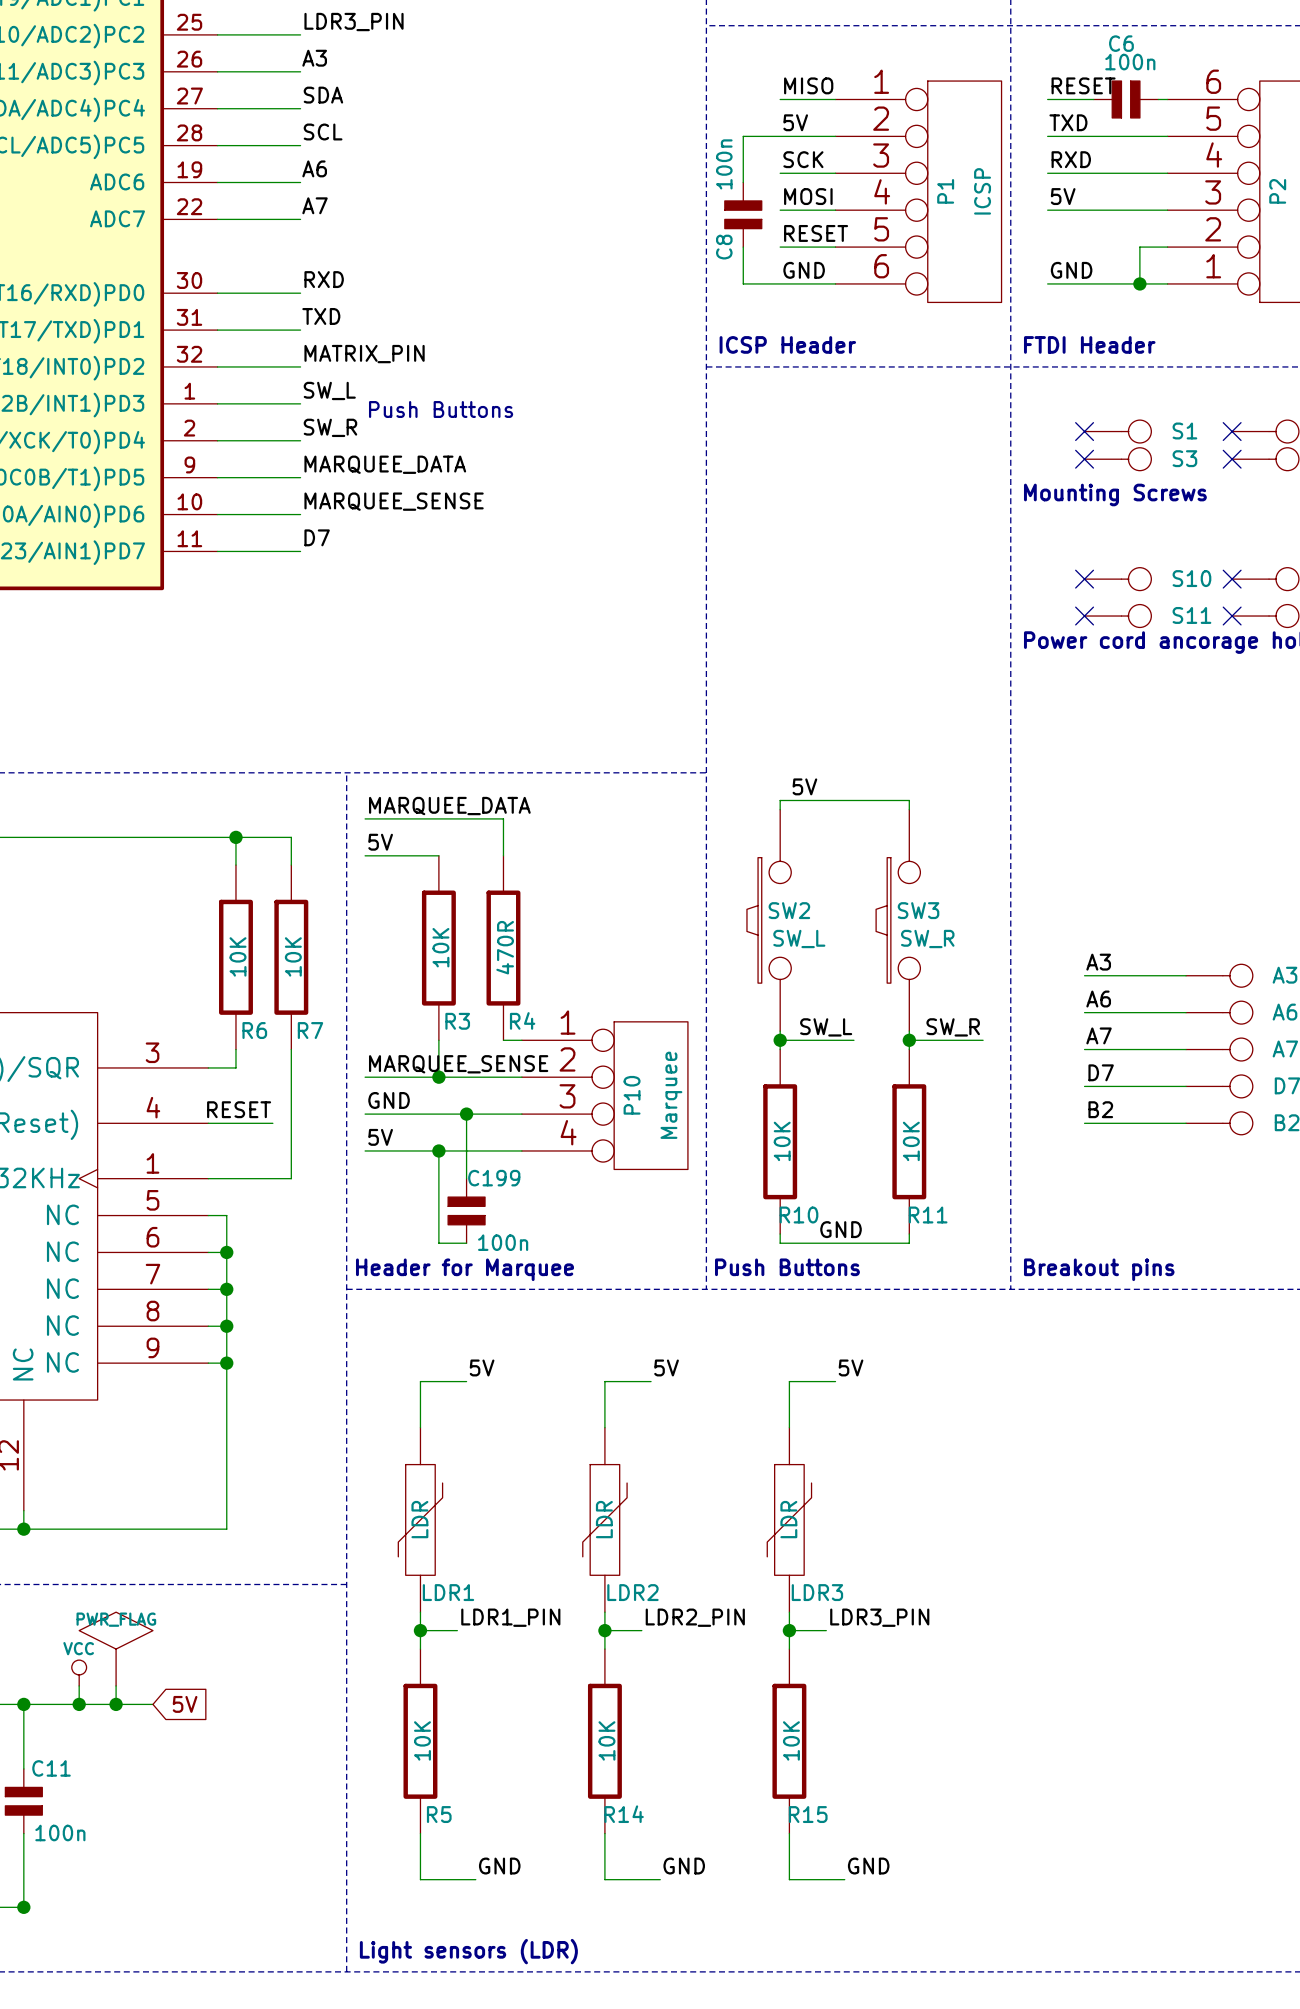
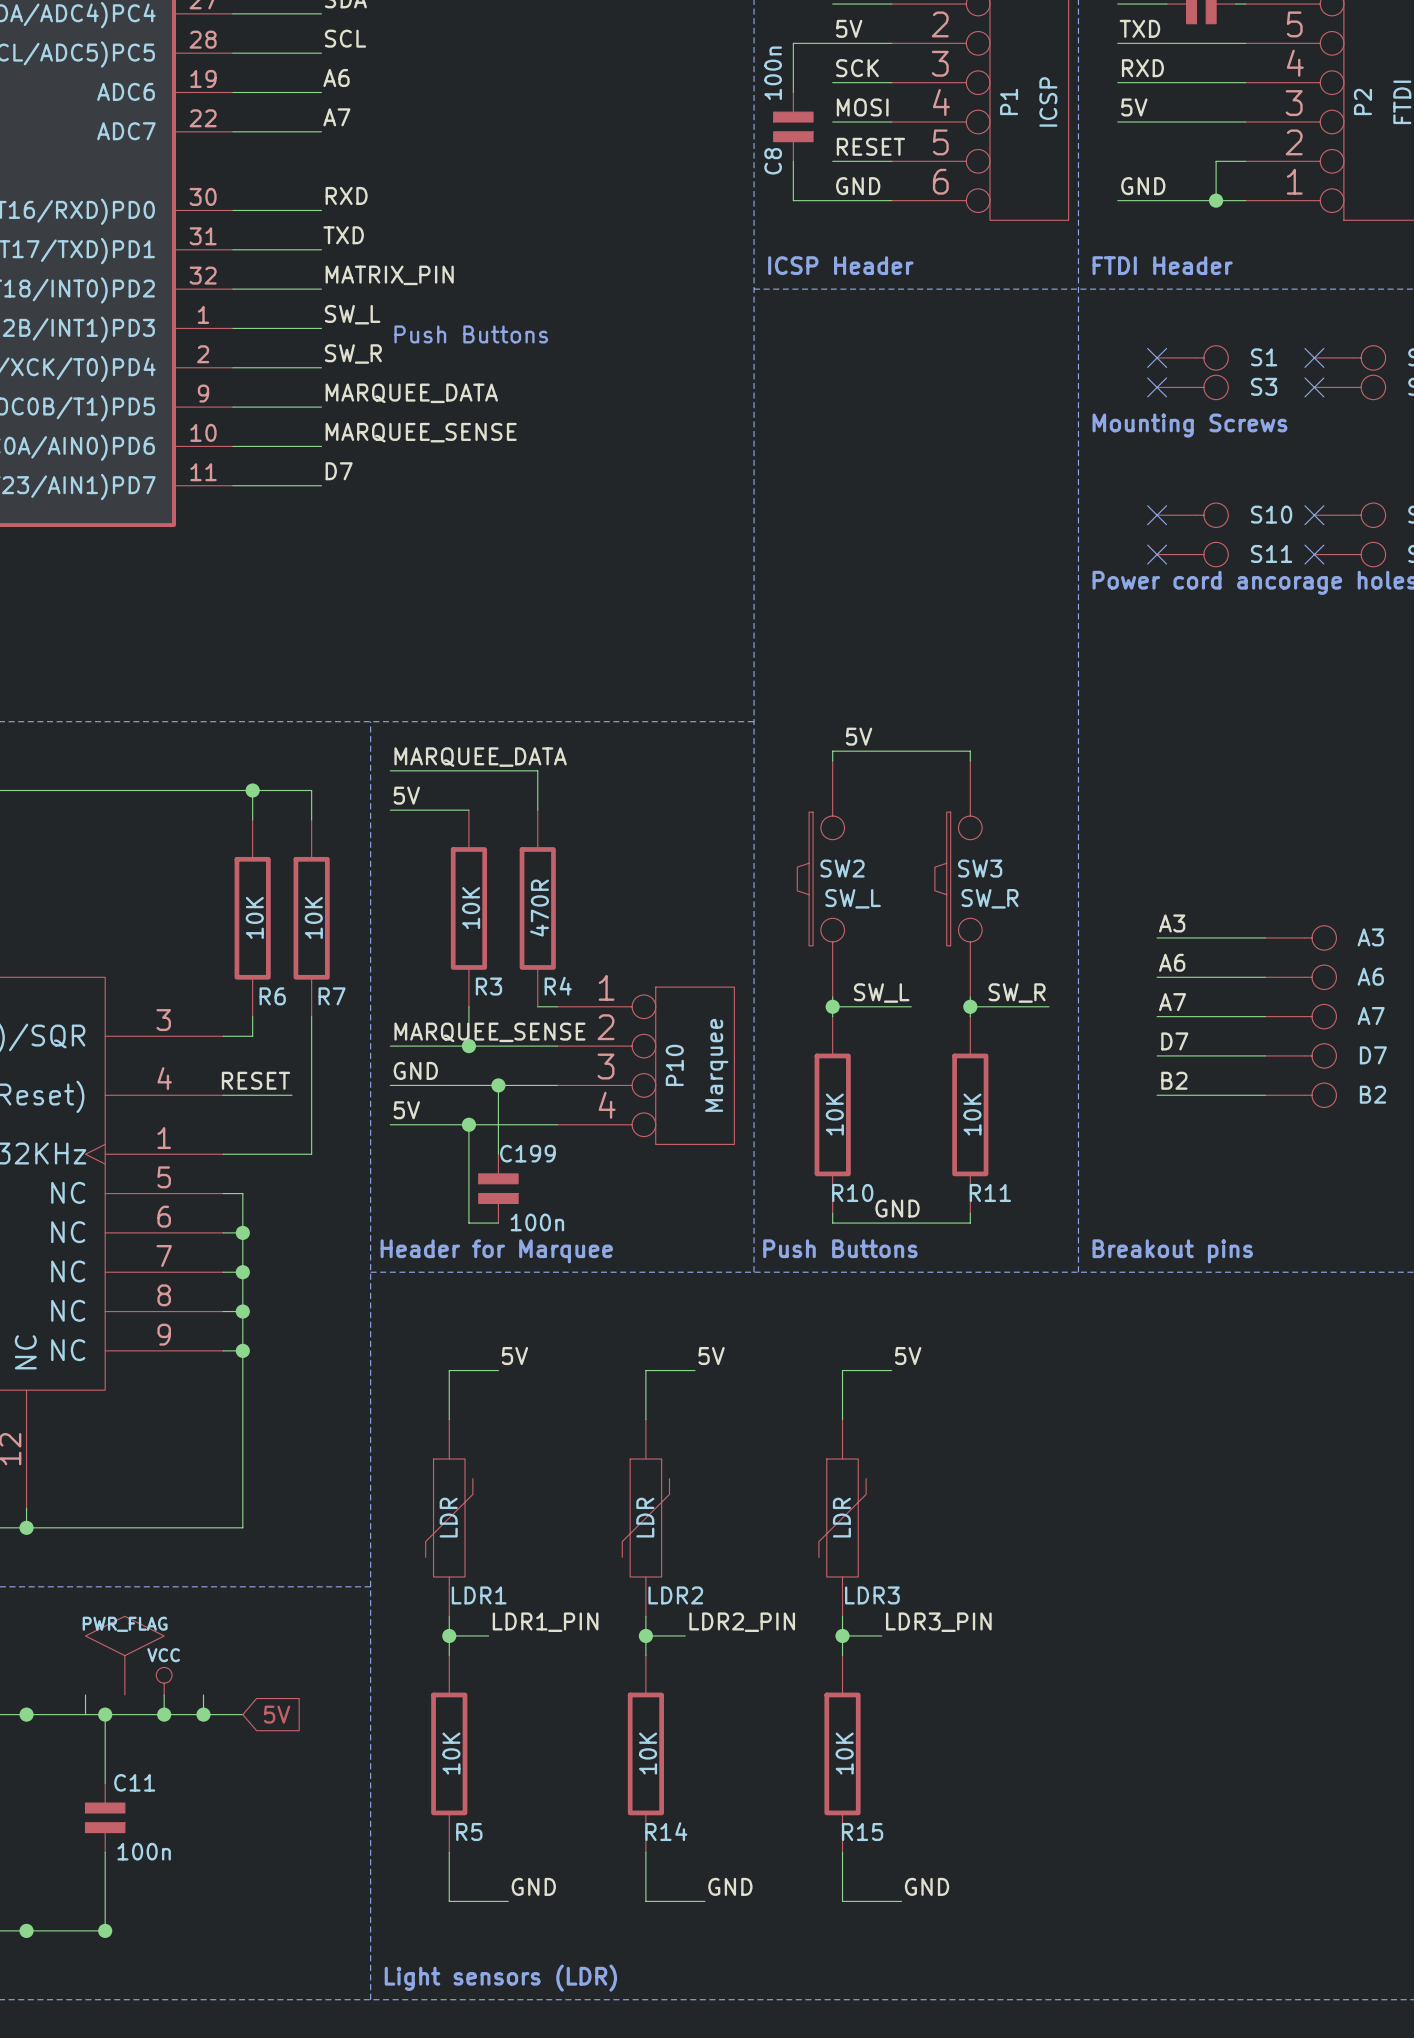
power symbol position: VCC (79, 1673) -> VCC (164, 1681)
wire: (116, 1685) (116, 1704) -> (203, 1694) (203, 1714)
wire: none -> (164, 1694) (164, 1714) (242, 1714)
wire: (23, 1704) (23, 1768) -> (105, 1714) (105, 1783)
junction: (79, 1704) -> none
junction: none -> (105, 1714)
junction: (116, 1704) -> none
junction: none -> (164, 1714)
global label position: 5V (185, 1704) -> 5V (277, 1714)
junction: none -> (203, 1714)
C11 position: (23, 1801) -> (105, 1817)
wire: (23, 1833) (23, 1907) -> (105, 1852) (105, 1930) (26, 1930)
junction: none -> (105, 1930)

